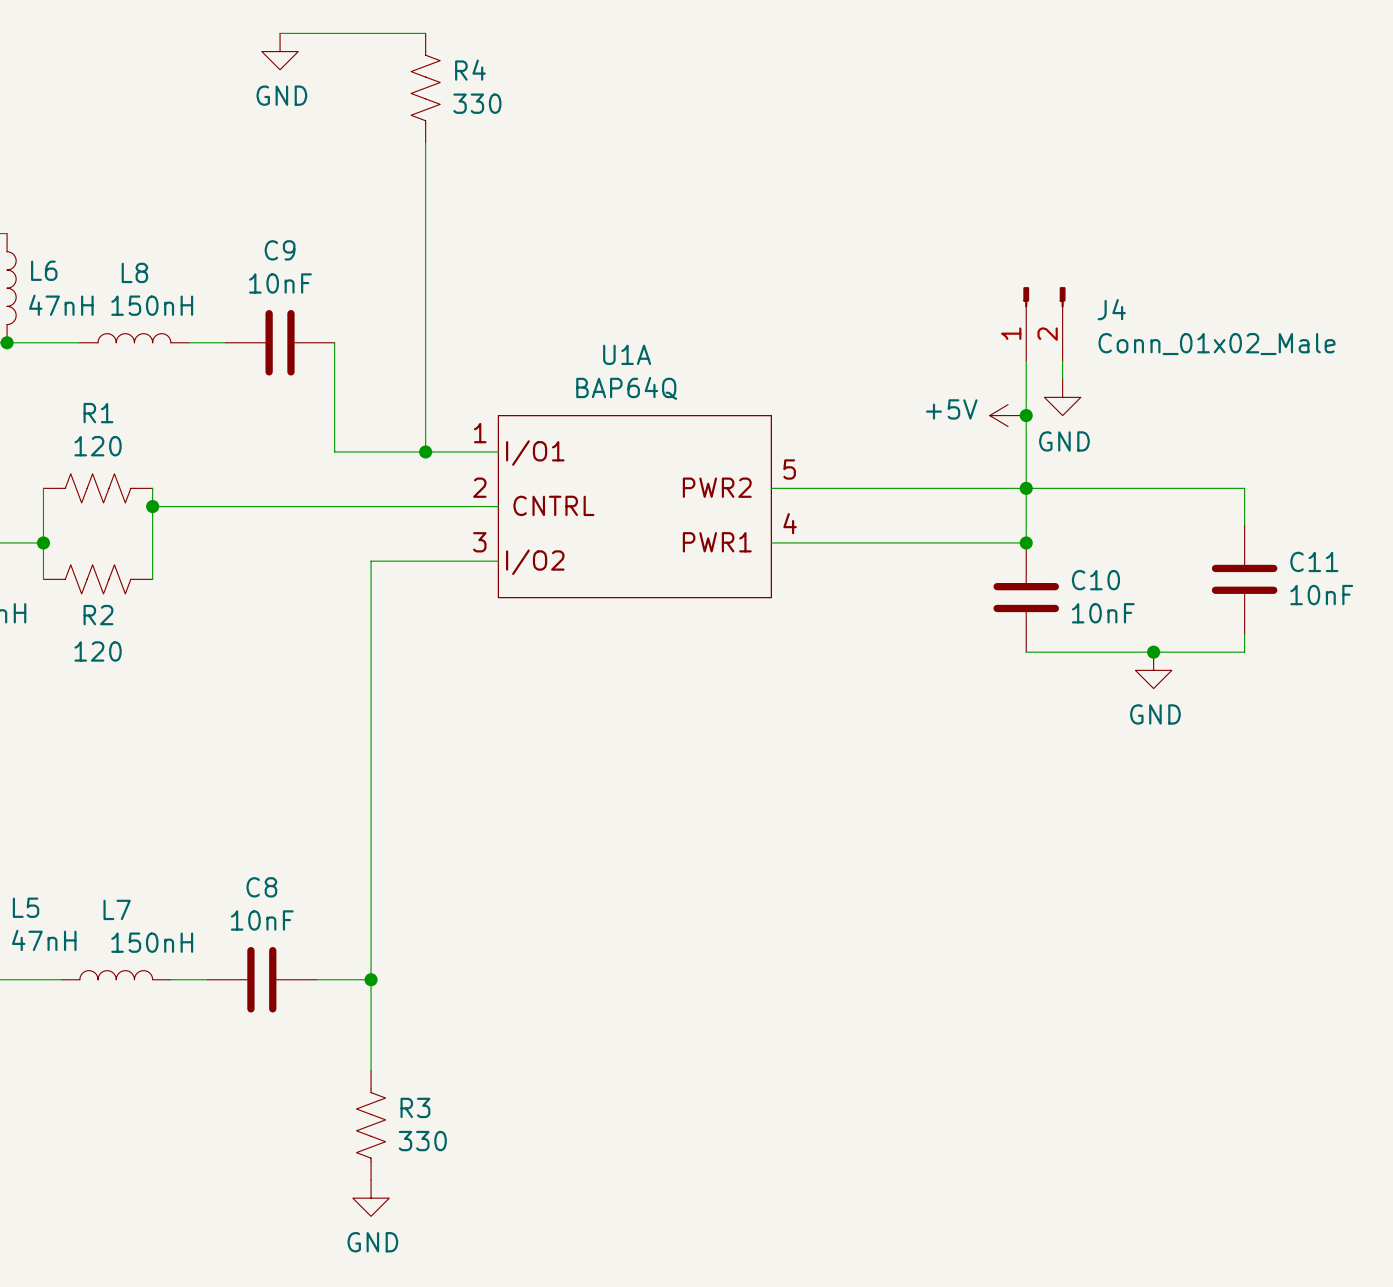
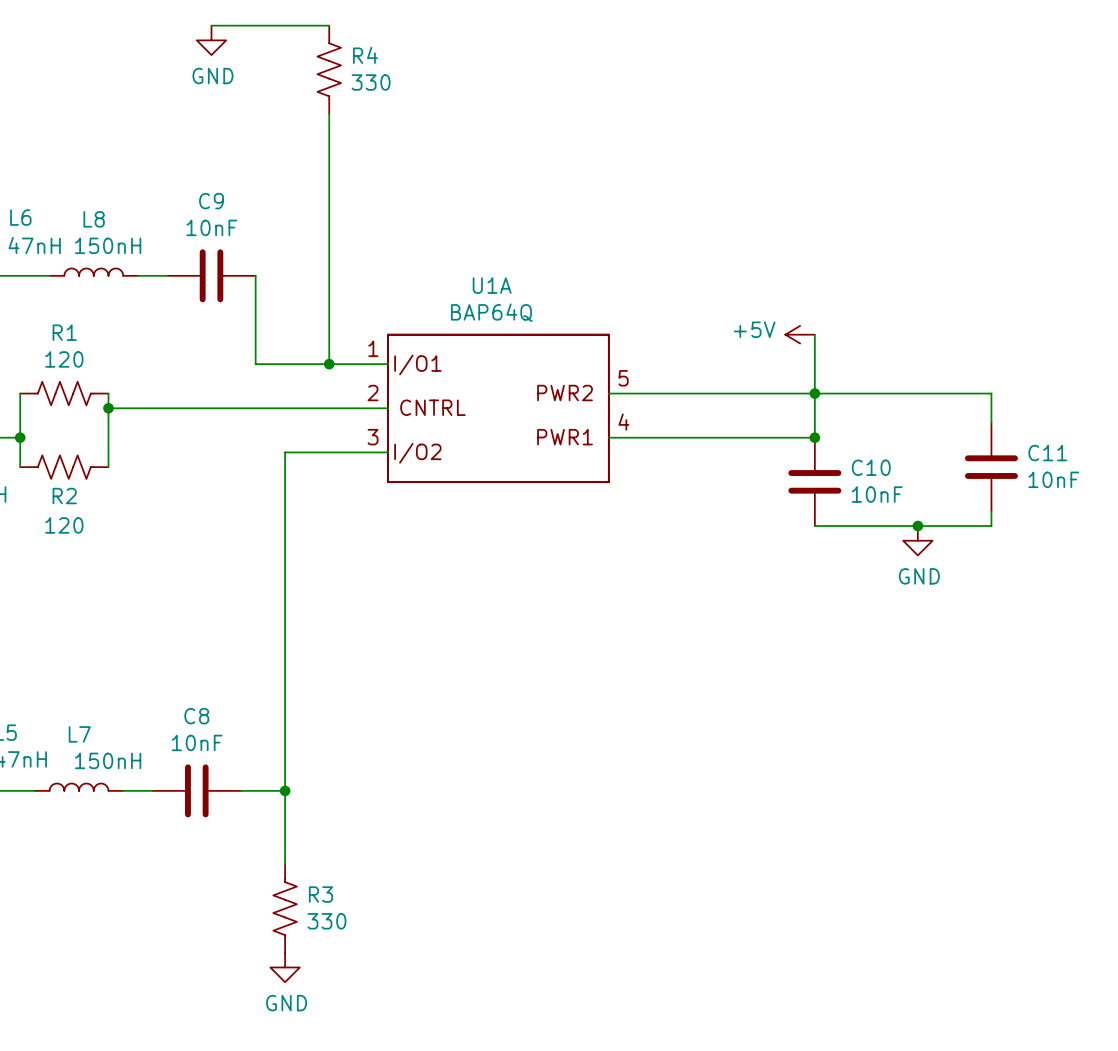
J4: Conn_01x02_Male (1044, 324) -> none
wire: (1026, 360) (1026, 415) -> none
wire: (1062, 360) (1062, 379) -> none
power symbol: GND (1062, 397) -> none
junction: (1026, 415) -> none

